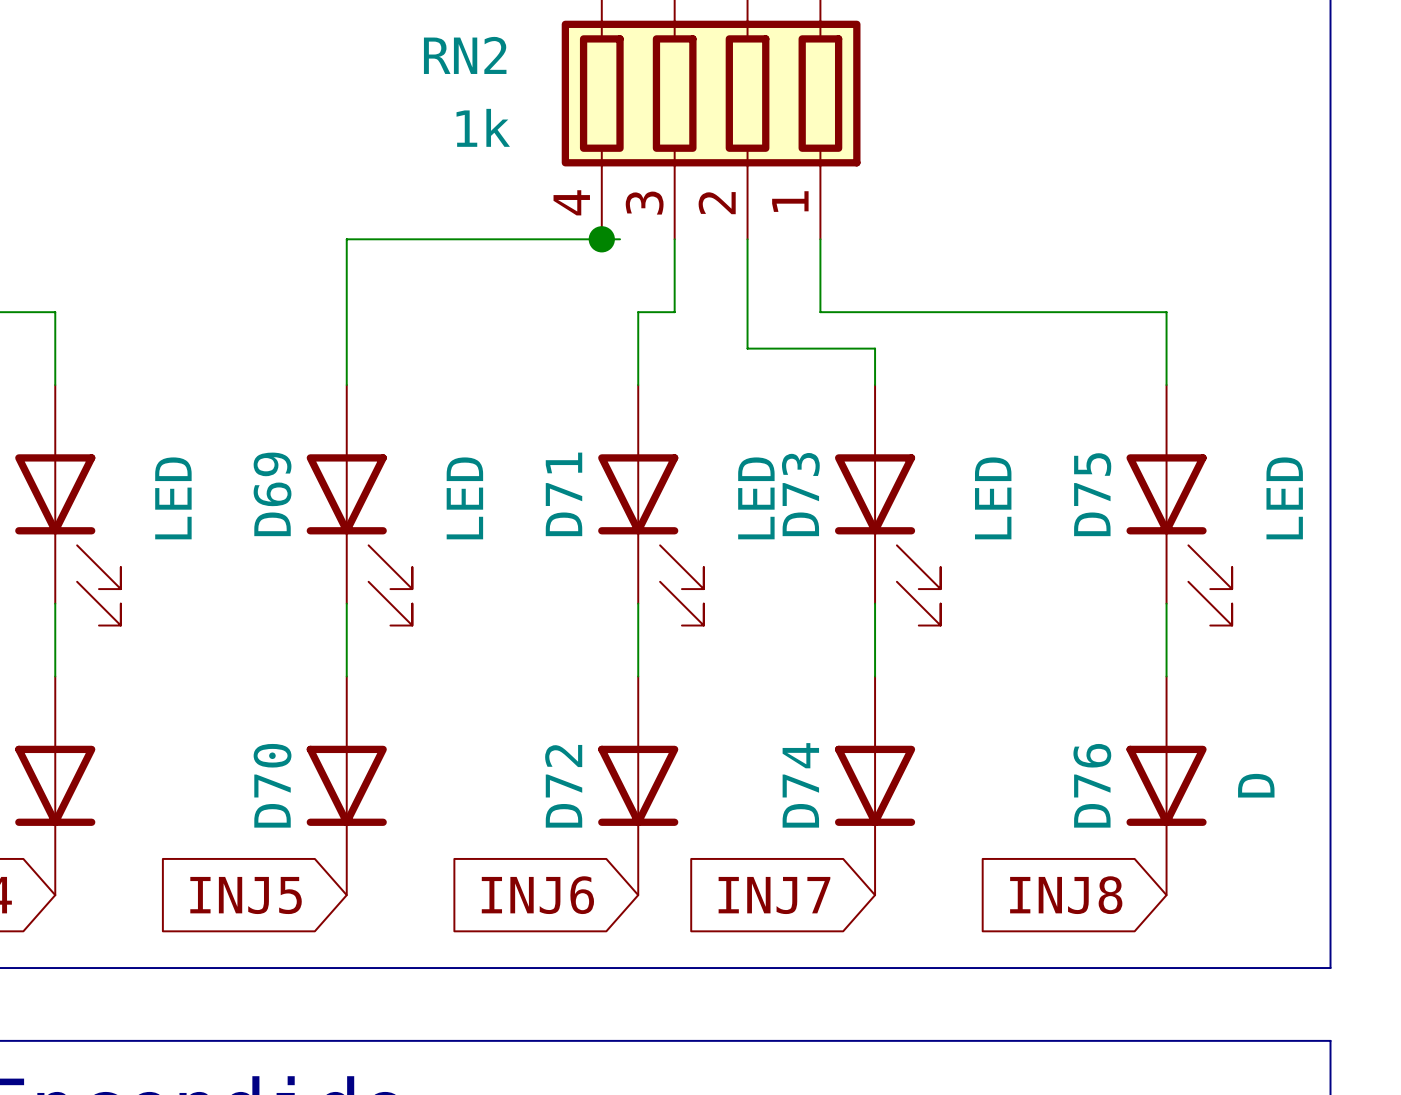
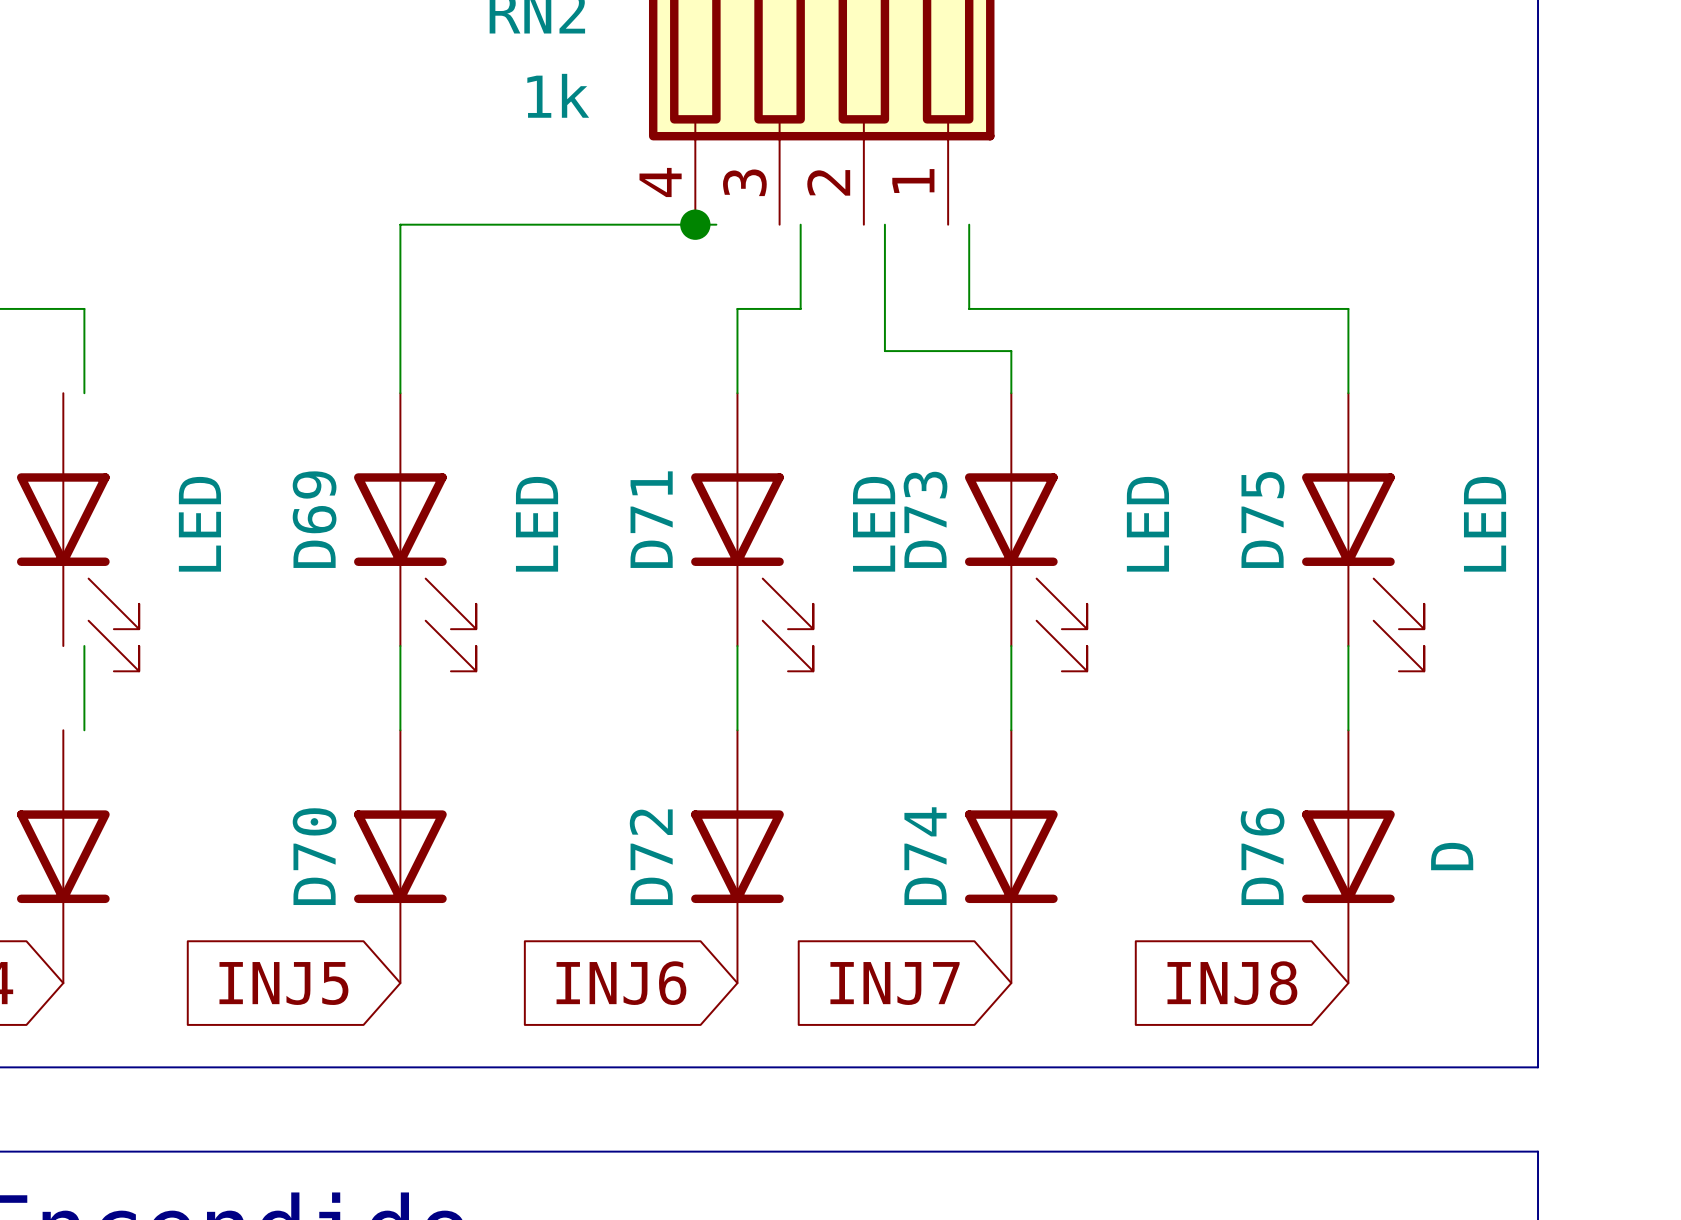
wire: (674, 239) (674, 312) -> (800, 224) (800, 308) (779, 308)
wire: (747, 239) (747, 348) (765, 348) -> (884, 224) (884, 351)
wire: (820, 239) (820, 312) (838, 312) -> (969, 224) (969, 308)
wire: (55, 312) (55, 385) -> (63, 308) (84, 308) (84, 393)
wire: (55, 603) (55, 676) -> (84, 646) (84, 730)

